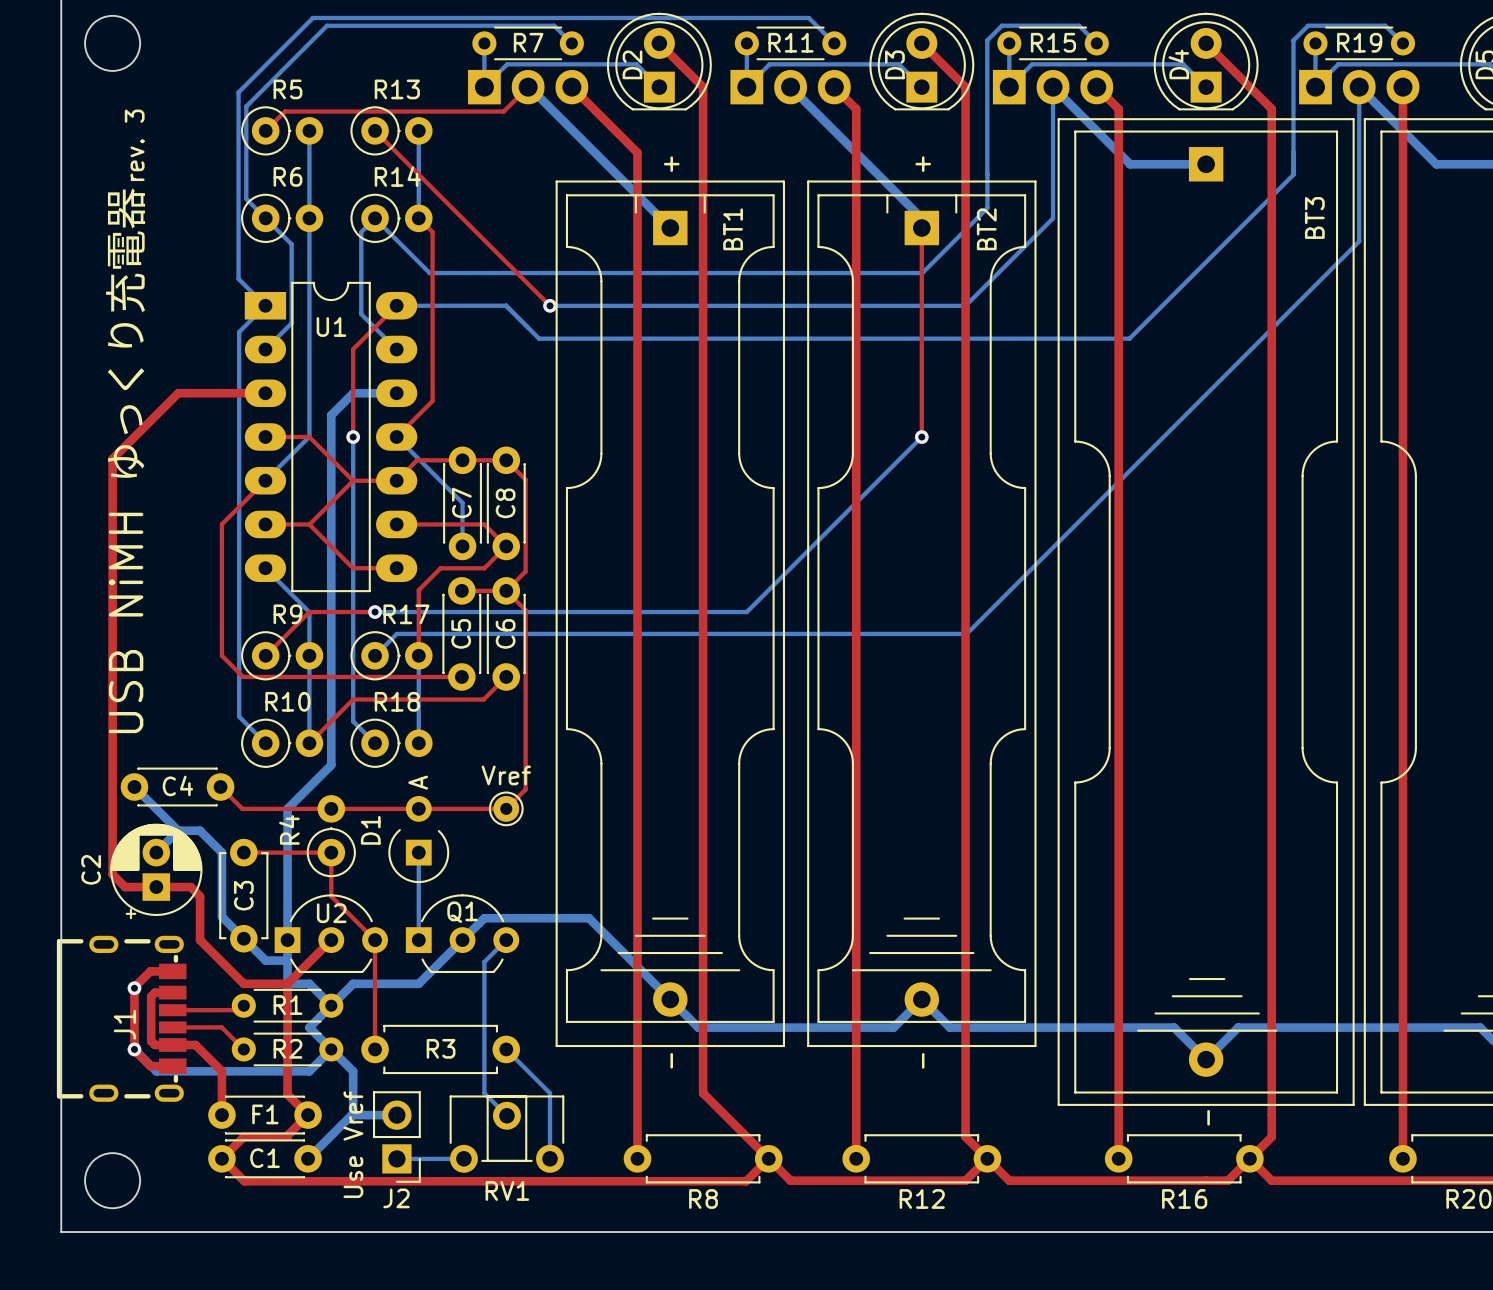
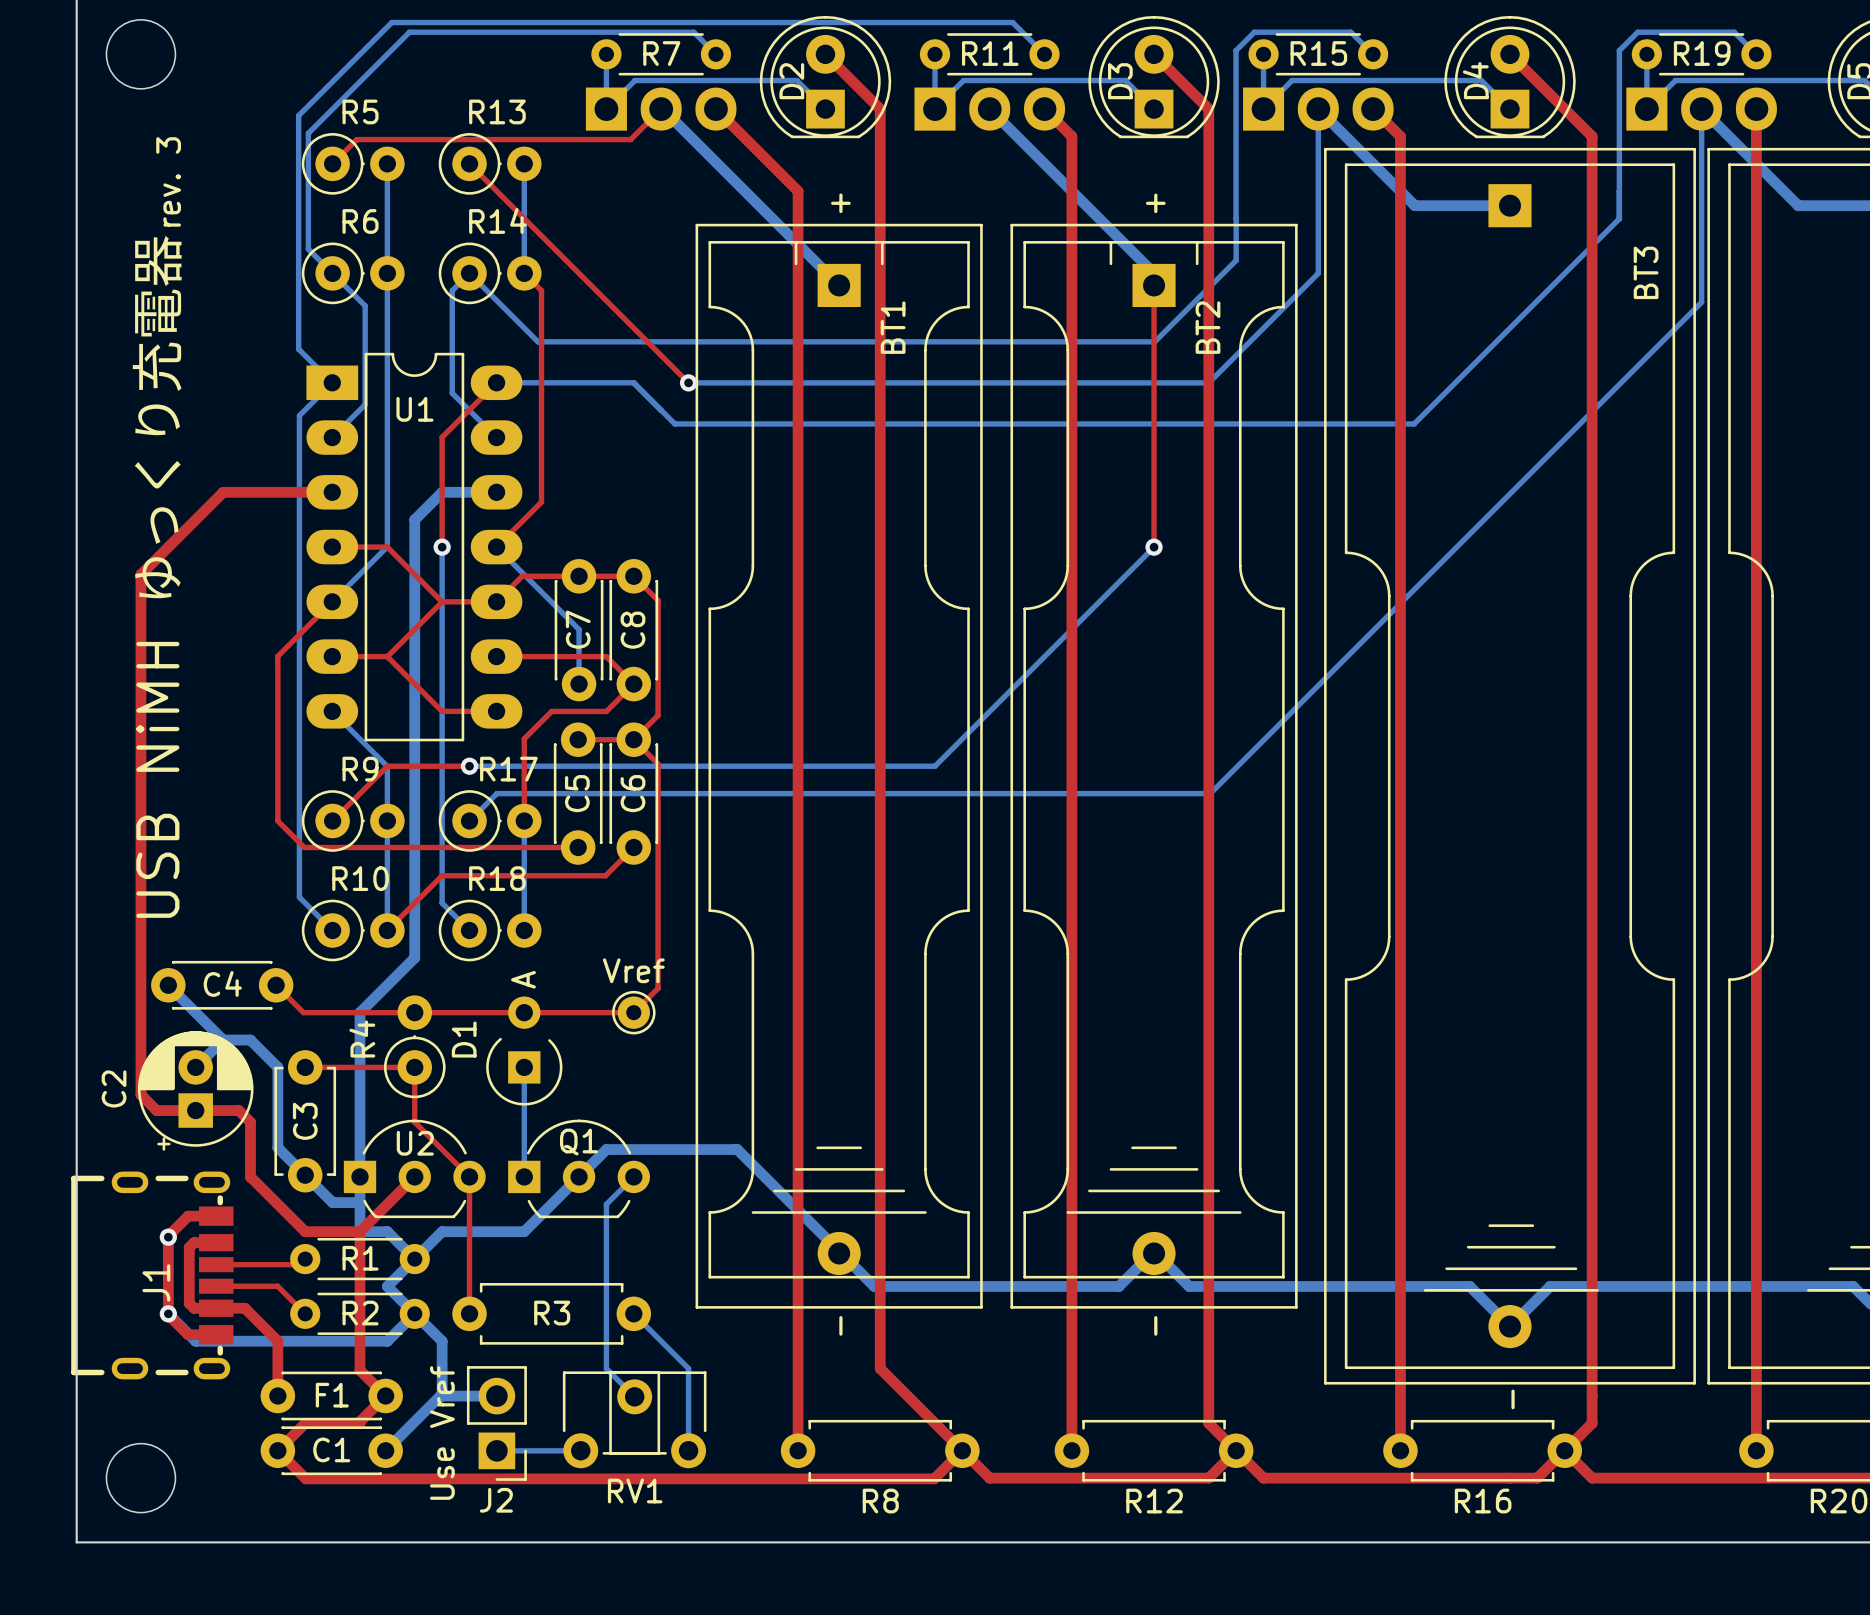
BT1 footprint: [555, 180, 785, 1048] -> [695, 223, 983, 1309]
BT2 footprint: [807, 180, 1037, 1048] -> [1010, 223, 1298, 1309]
BT1 name position: BT1 (733, 229) -> BT1 (893, 327)
BT2 name position: BT2 (986, 229) -> BT2 (1207, 327)

